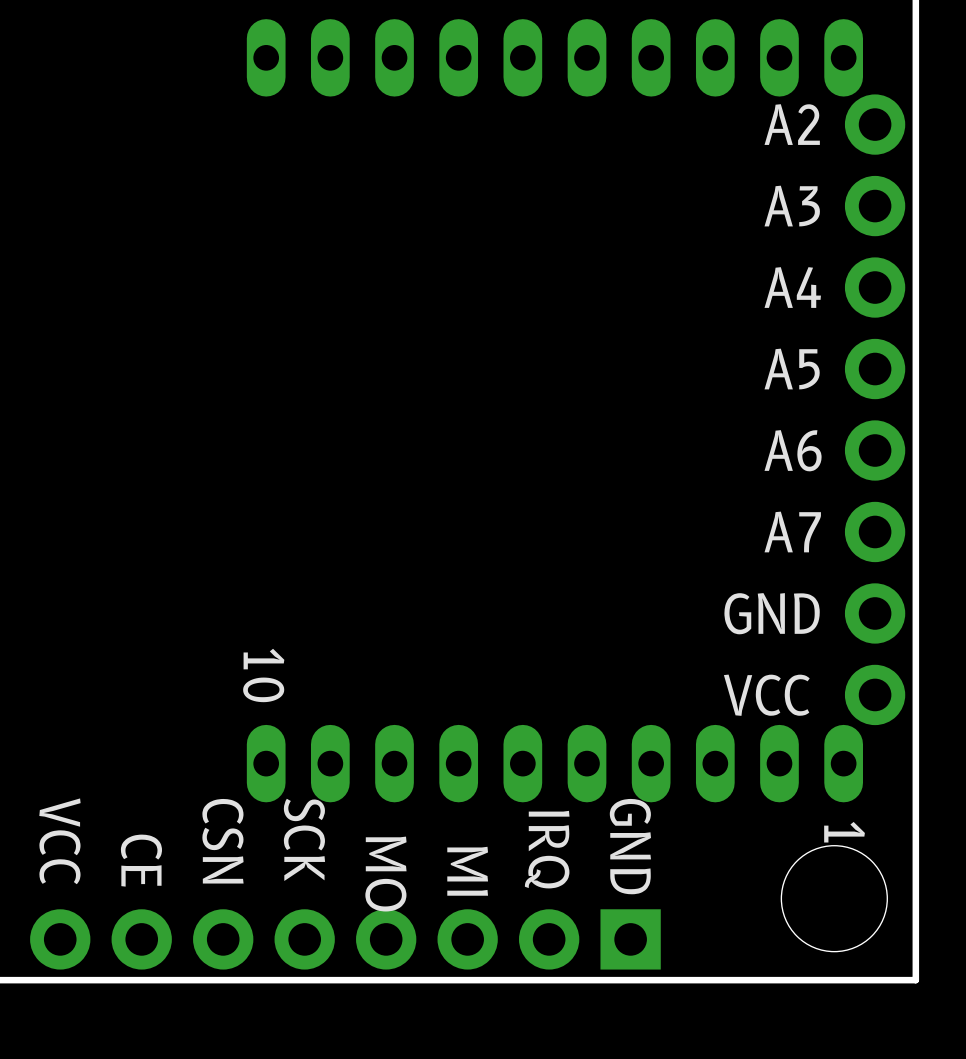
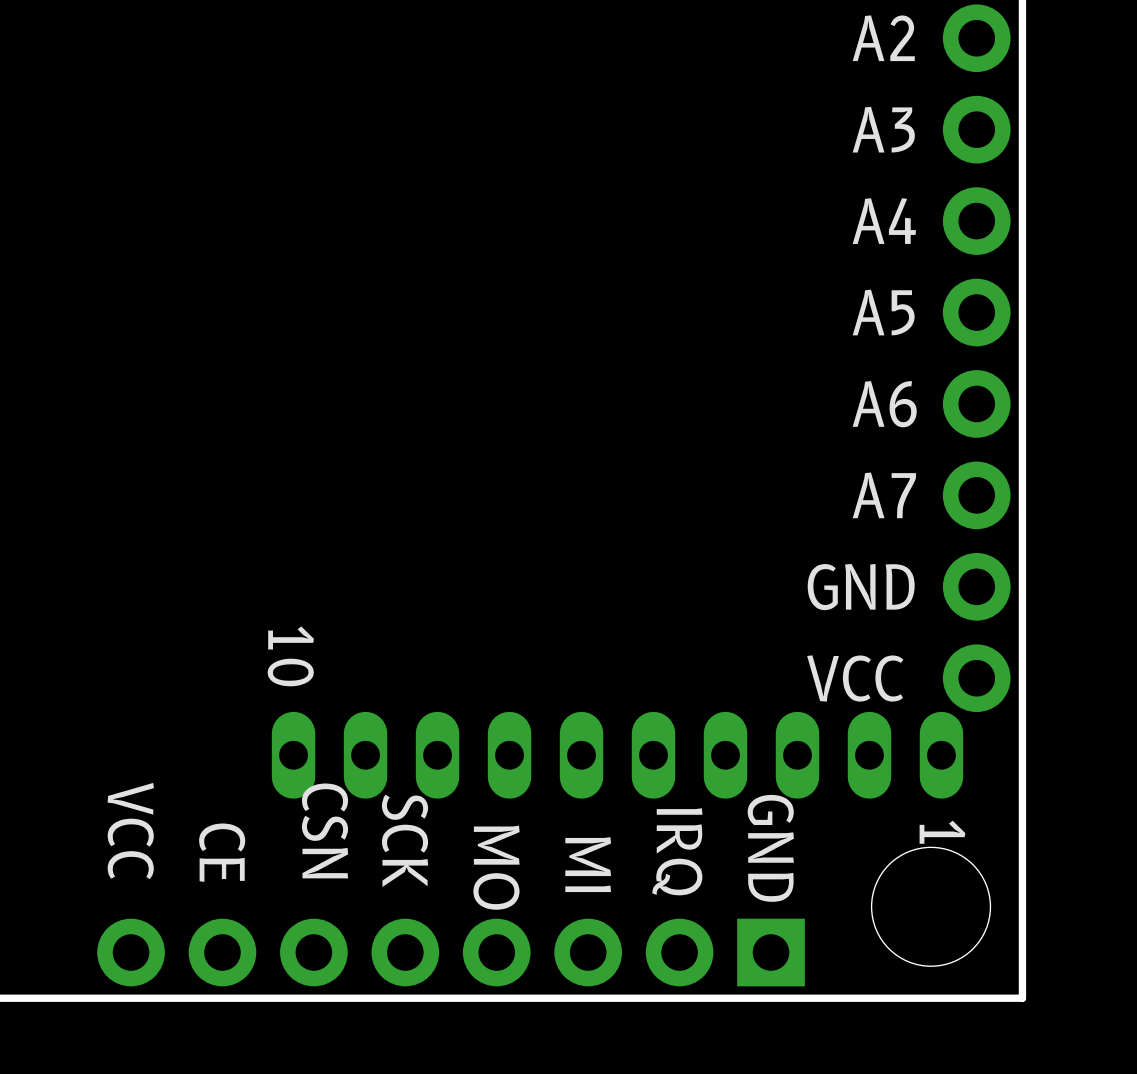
text position: SCK (304, 839) -> SCK (405, 840)
text position: VCC (59, 841) -> VCC (130, 831)
text position: CSN (222, 841) -> CSN (325, 830)
text position: GND (630, 846) -> GND (770, 848)
text position: IRQ (547, 849) -> IRQ (677, 851)
text position: CE (141, 860) -> CE (222, 852)
text position: MI (467, 871) -> MI (588, 864)
text position: MO (385, 874) -> MO (496, 867)
part position: (345, 939) -> (451, 952)

